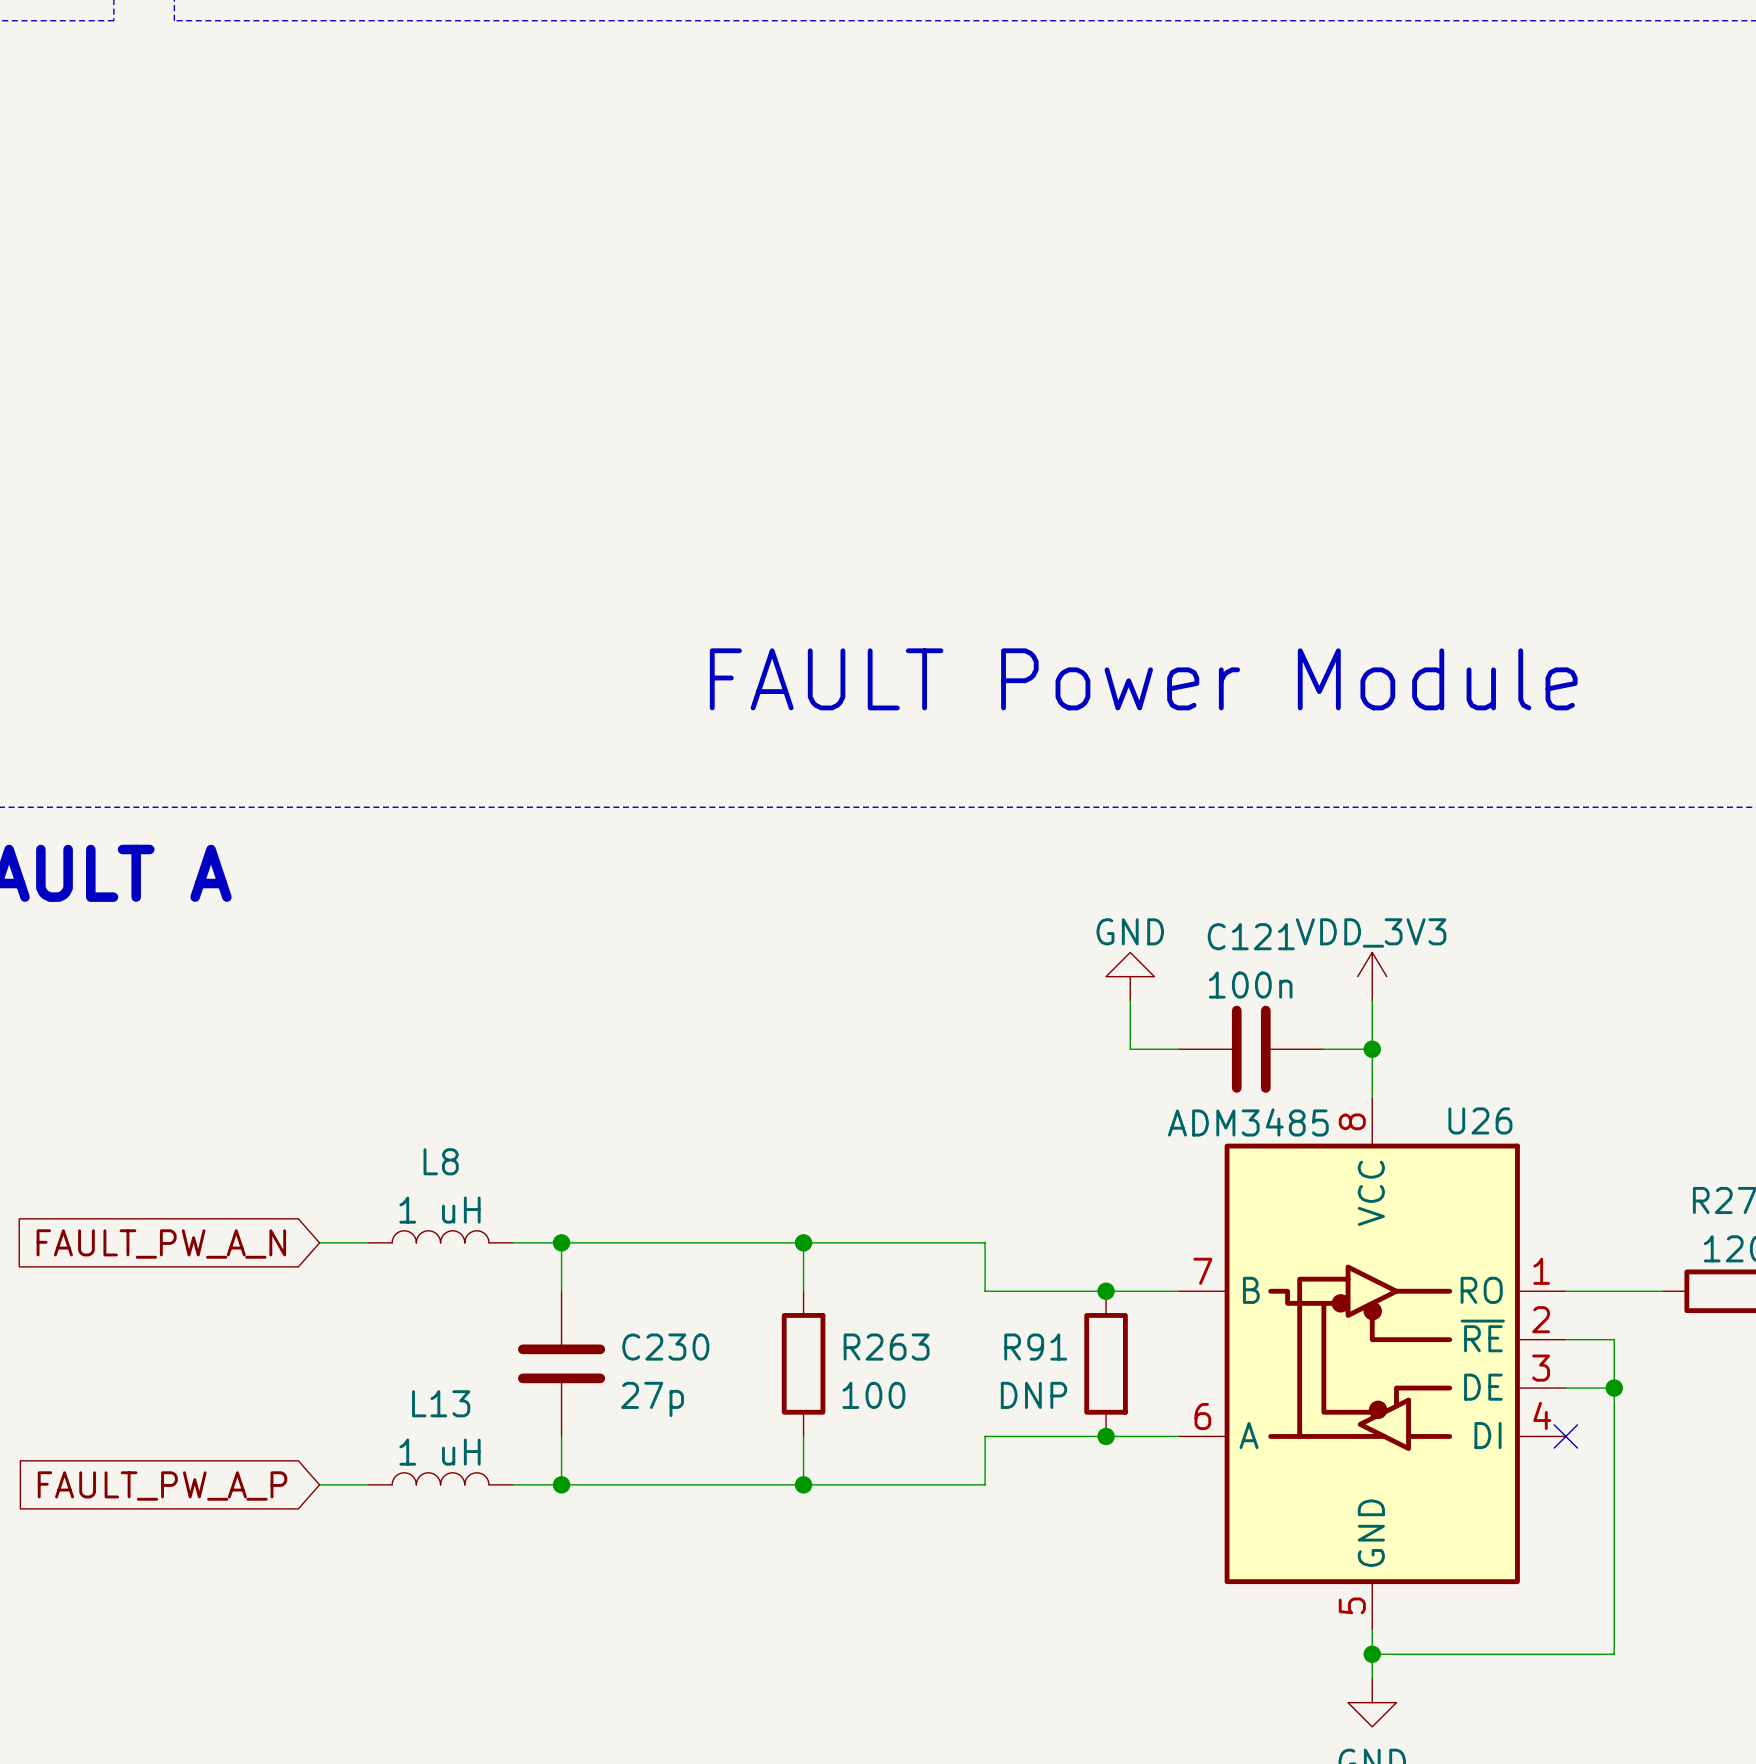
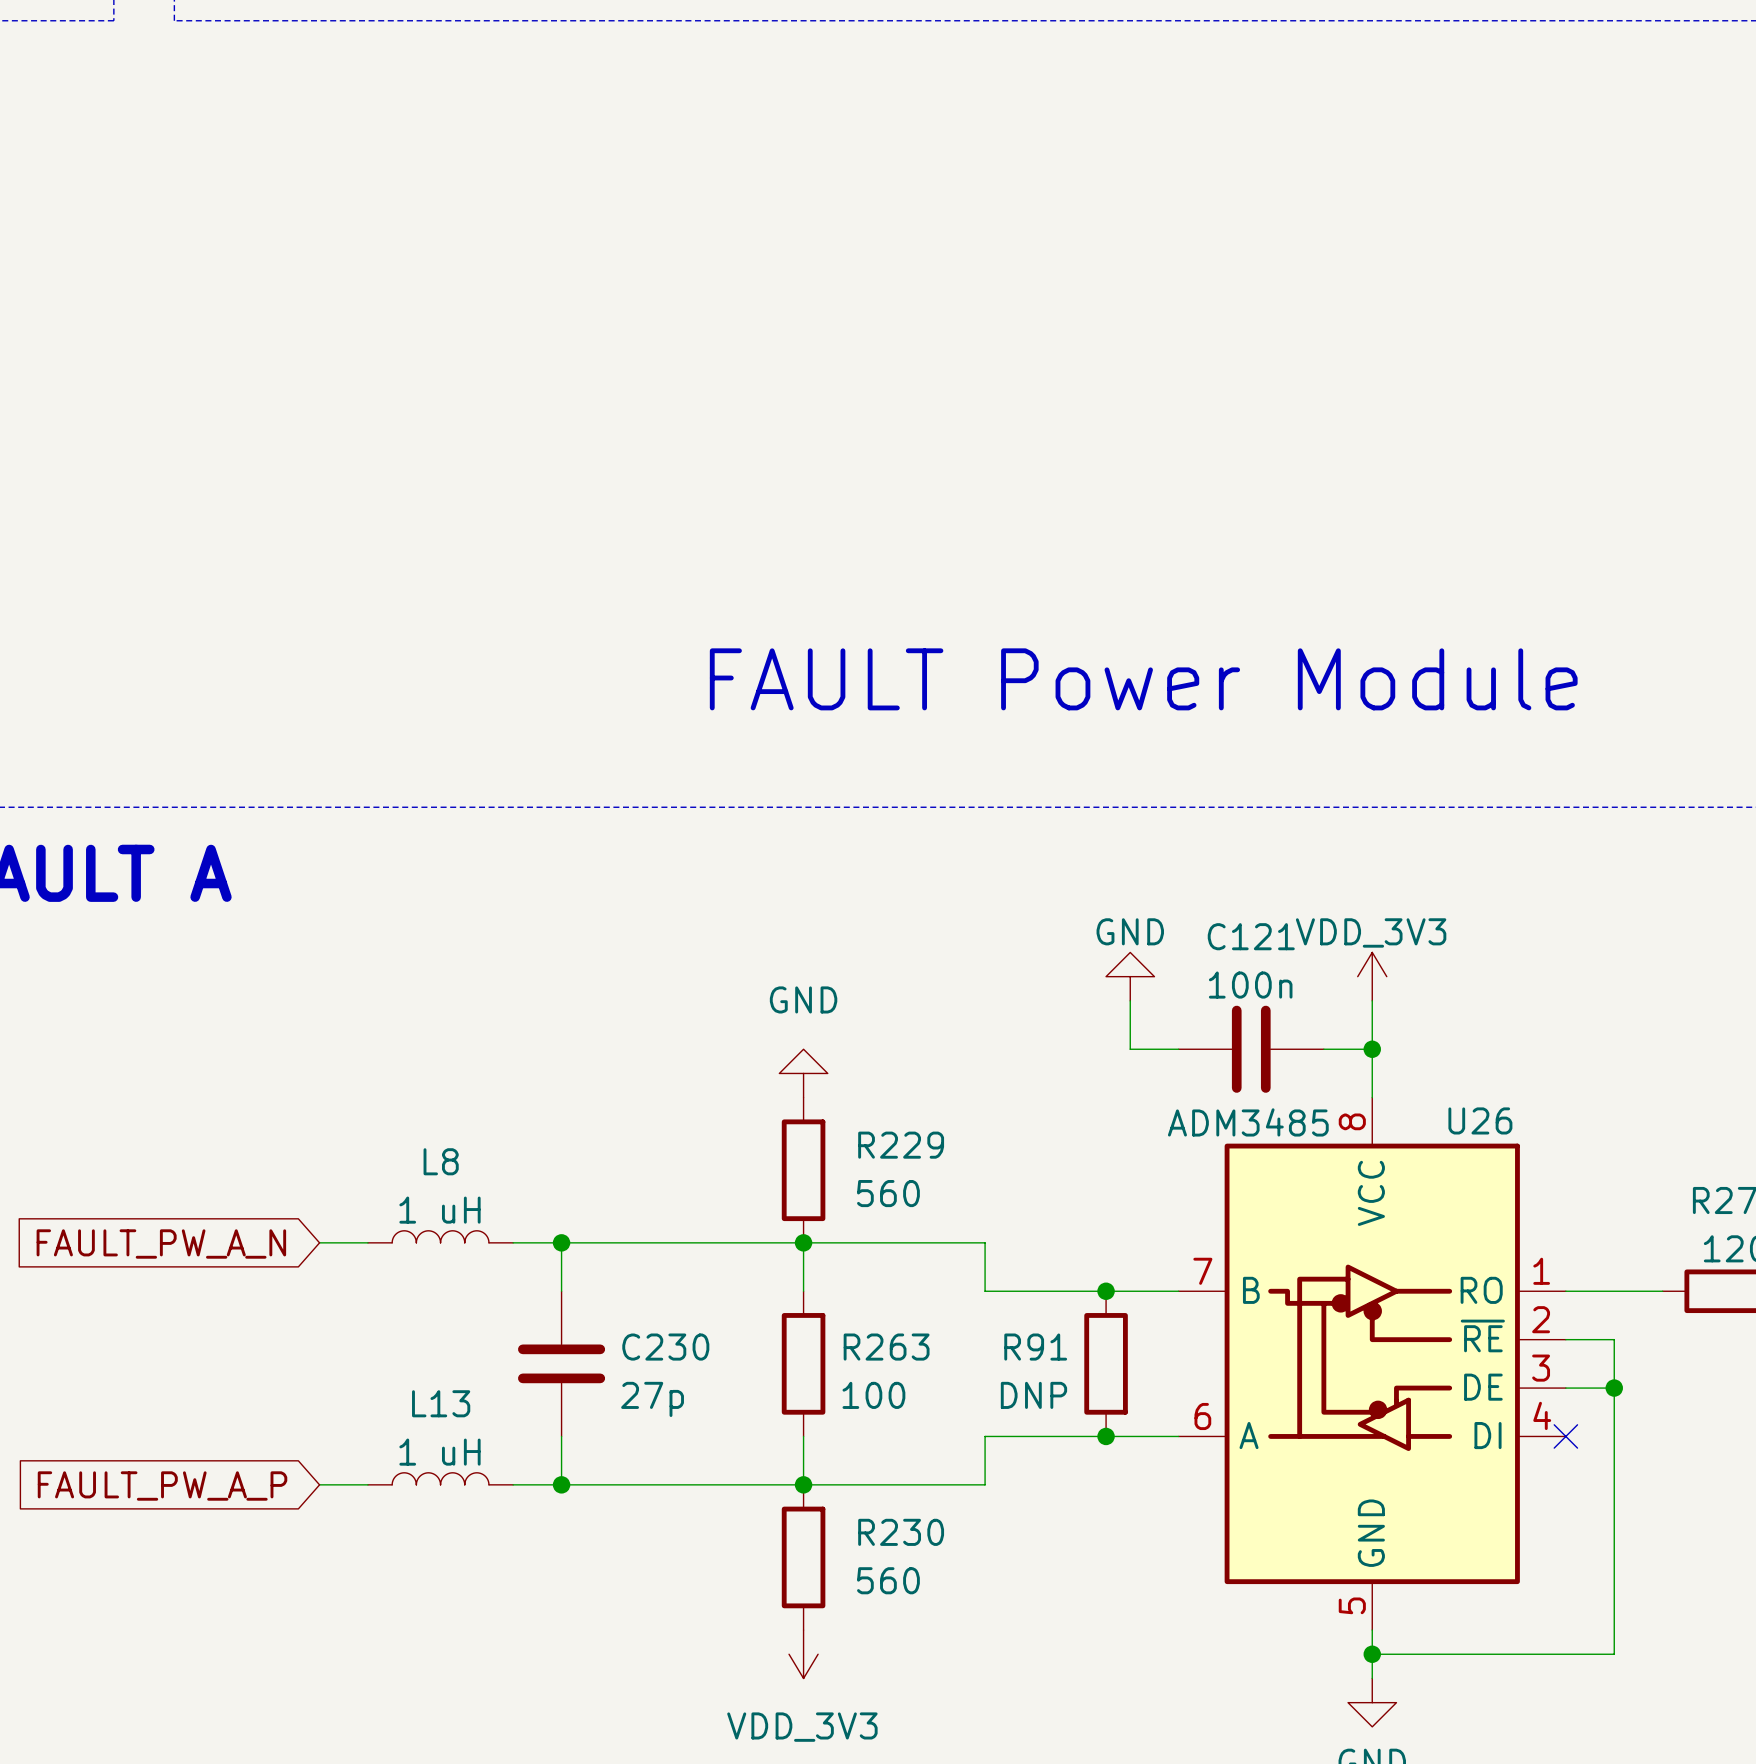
power symbol: none -> GND (803, 1073)
R229: none -> 560 (803, 1170)
R230: none -> 560 (803, 1557)
power symbol: none -> VDD_3V3 (803, 1654)

